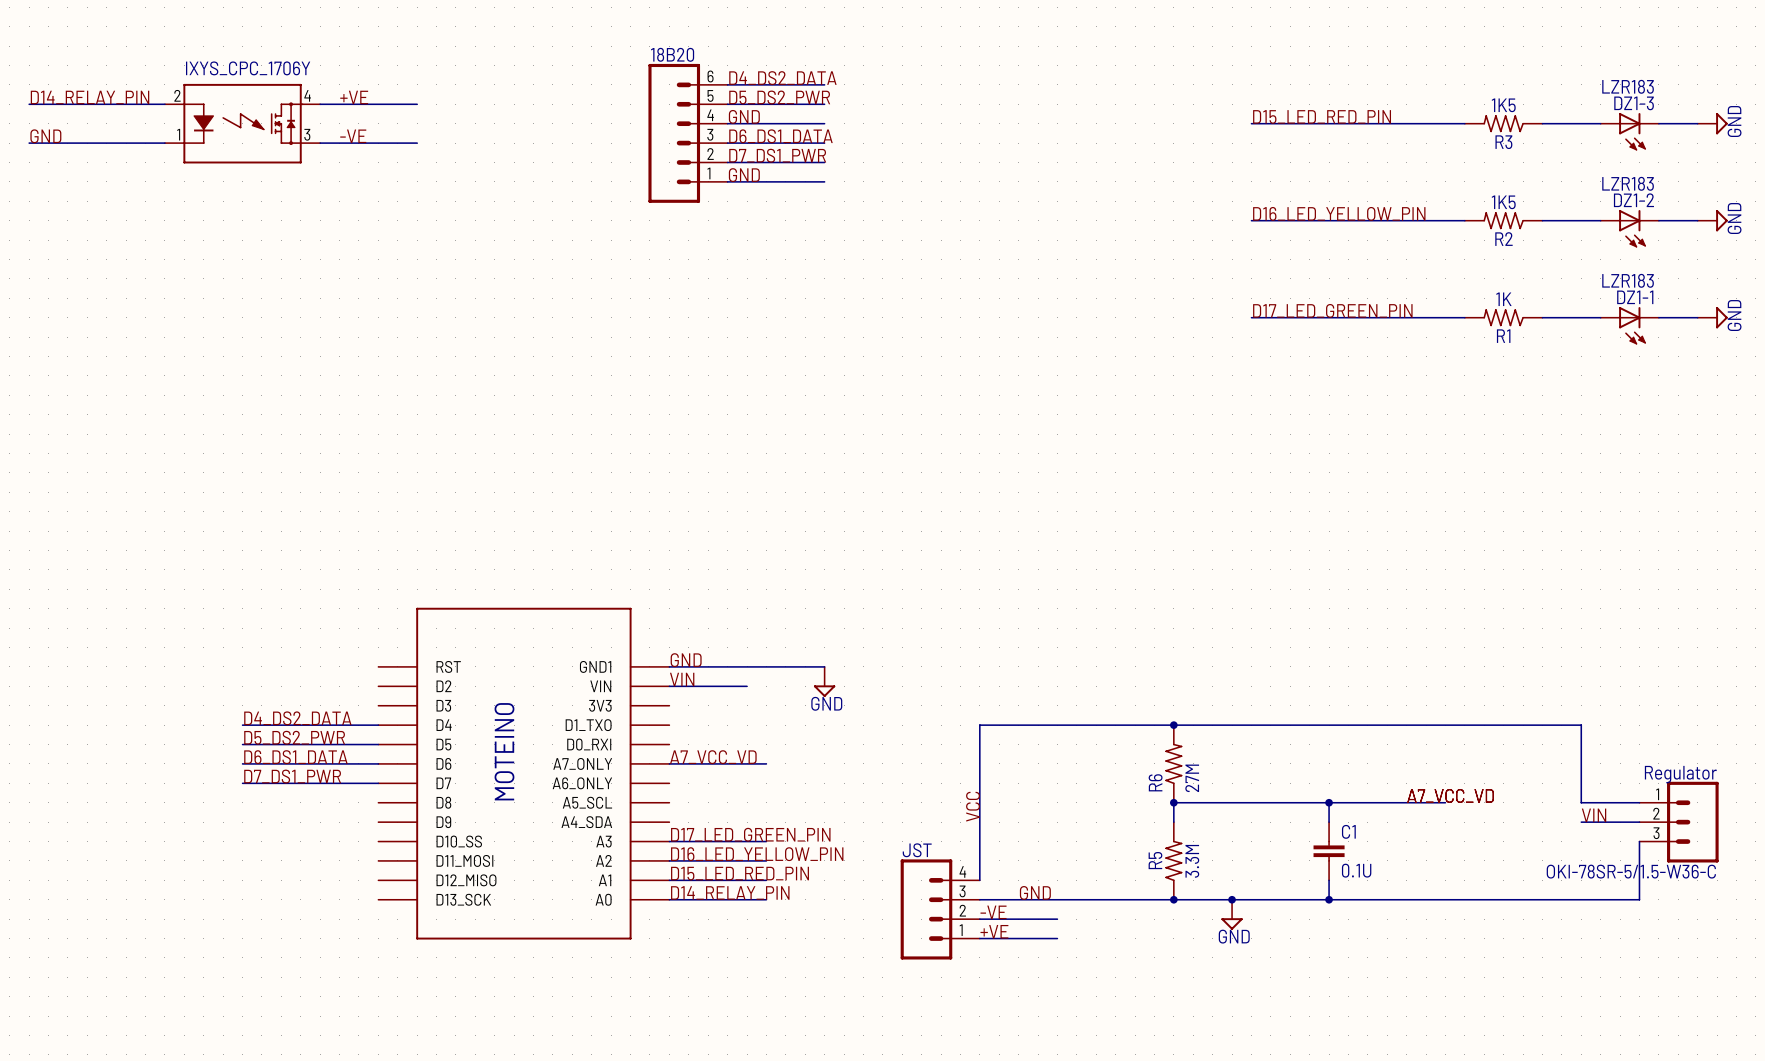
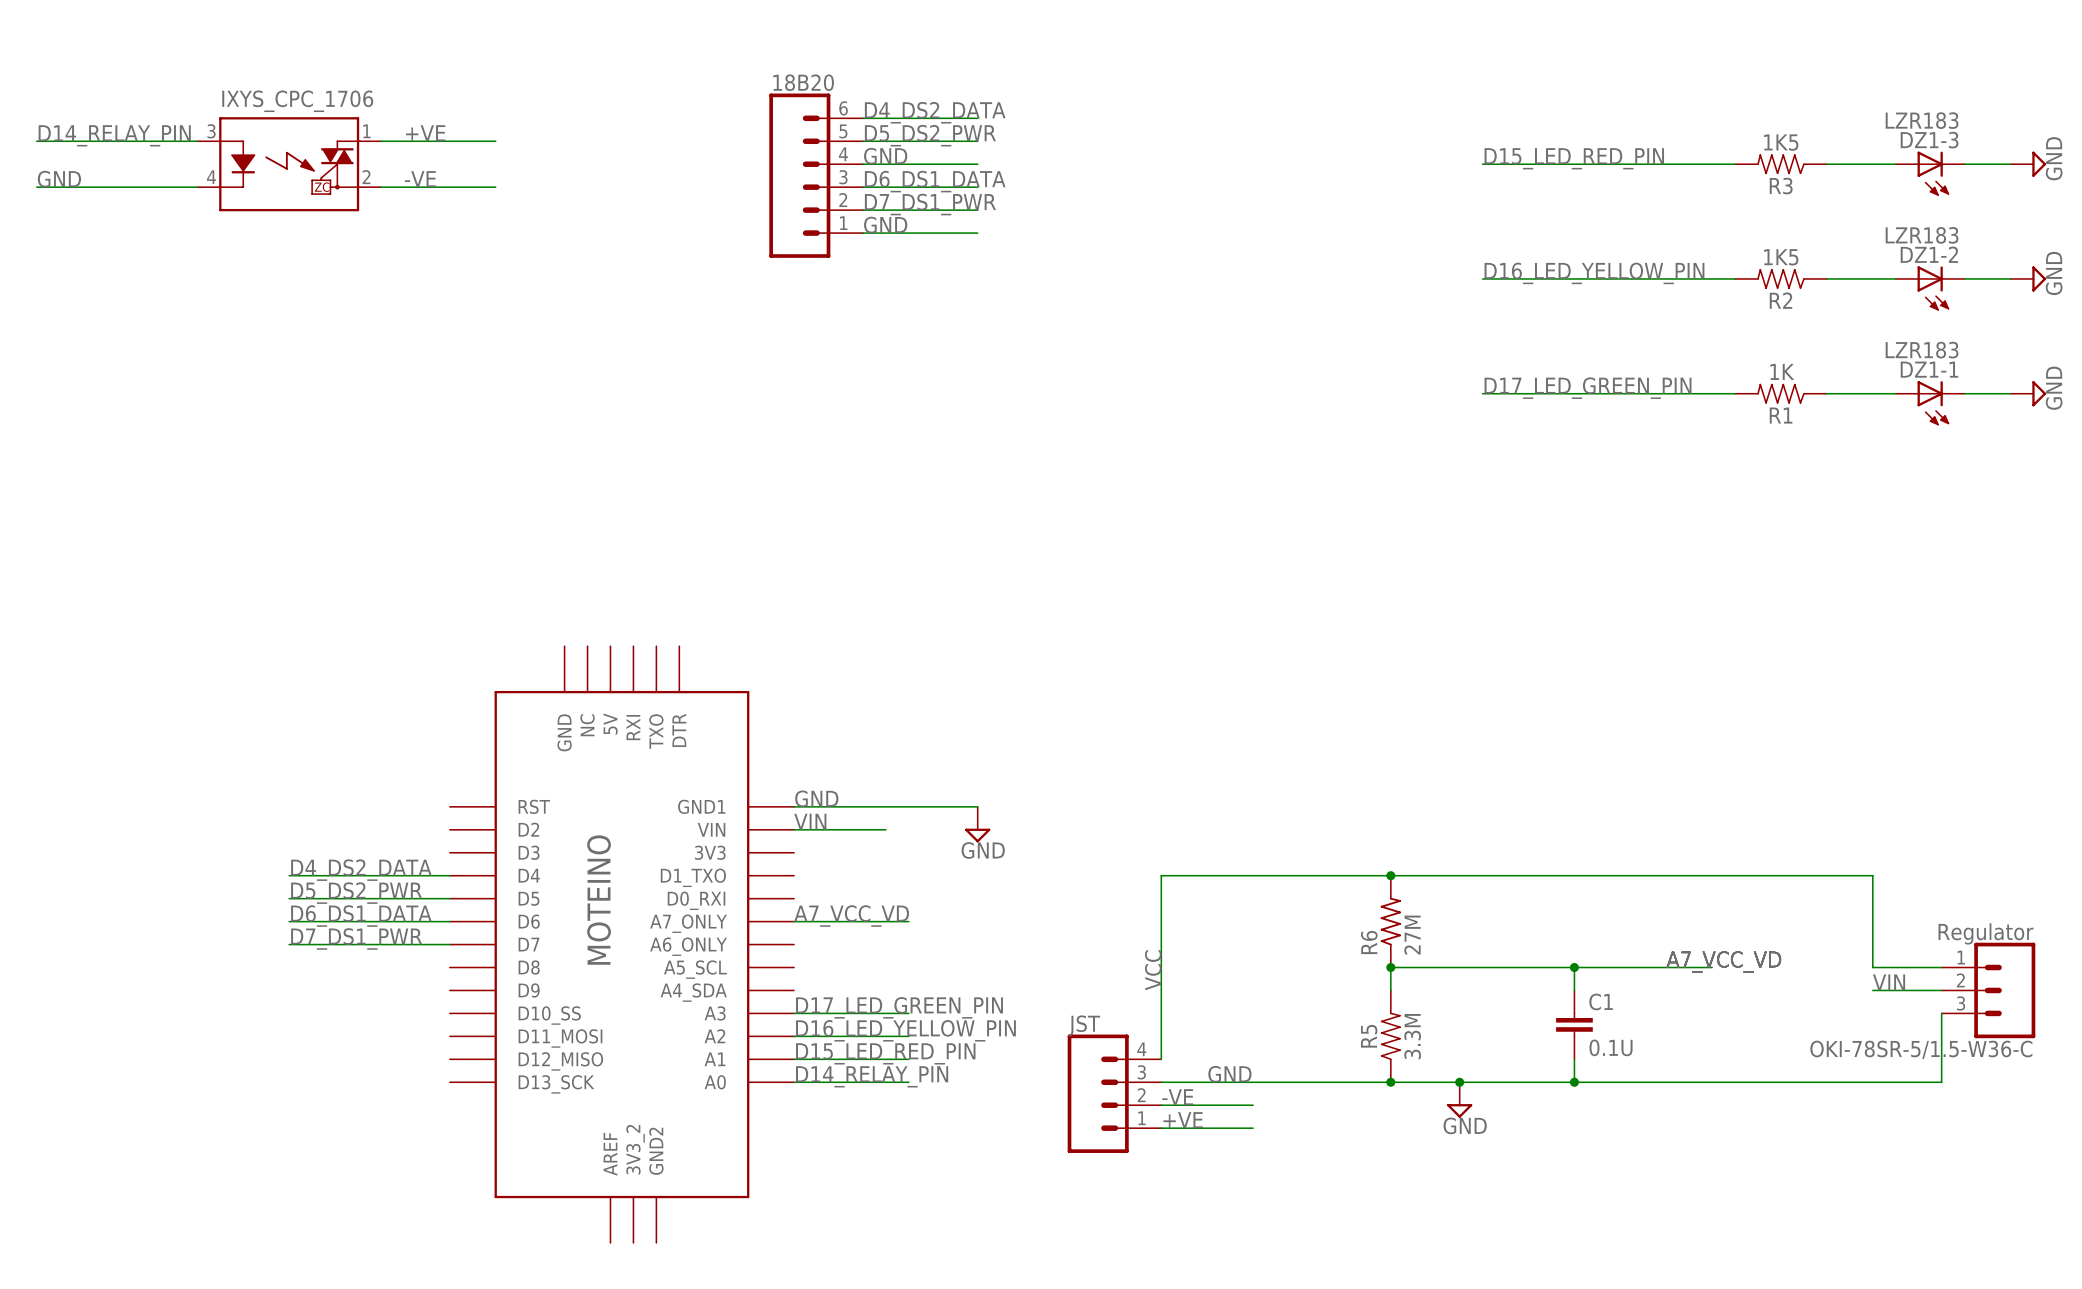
IXYS_CPC_1706Y: (242, 123) -> none
IXYS_CPC_1706: none -> (289, 164)
part: (523, 773) -> none
part: none -> (621, 944)

